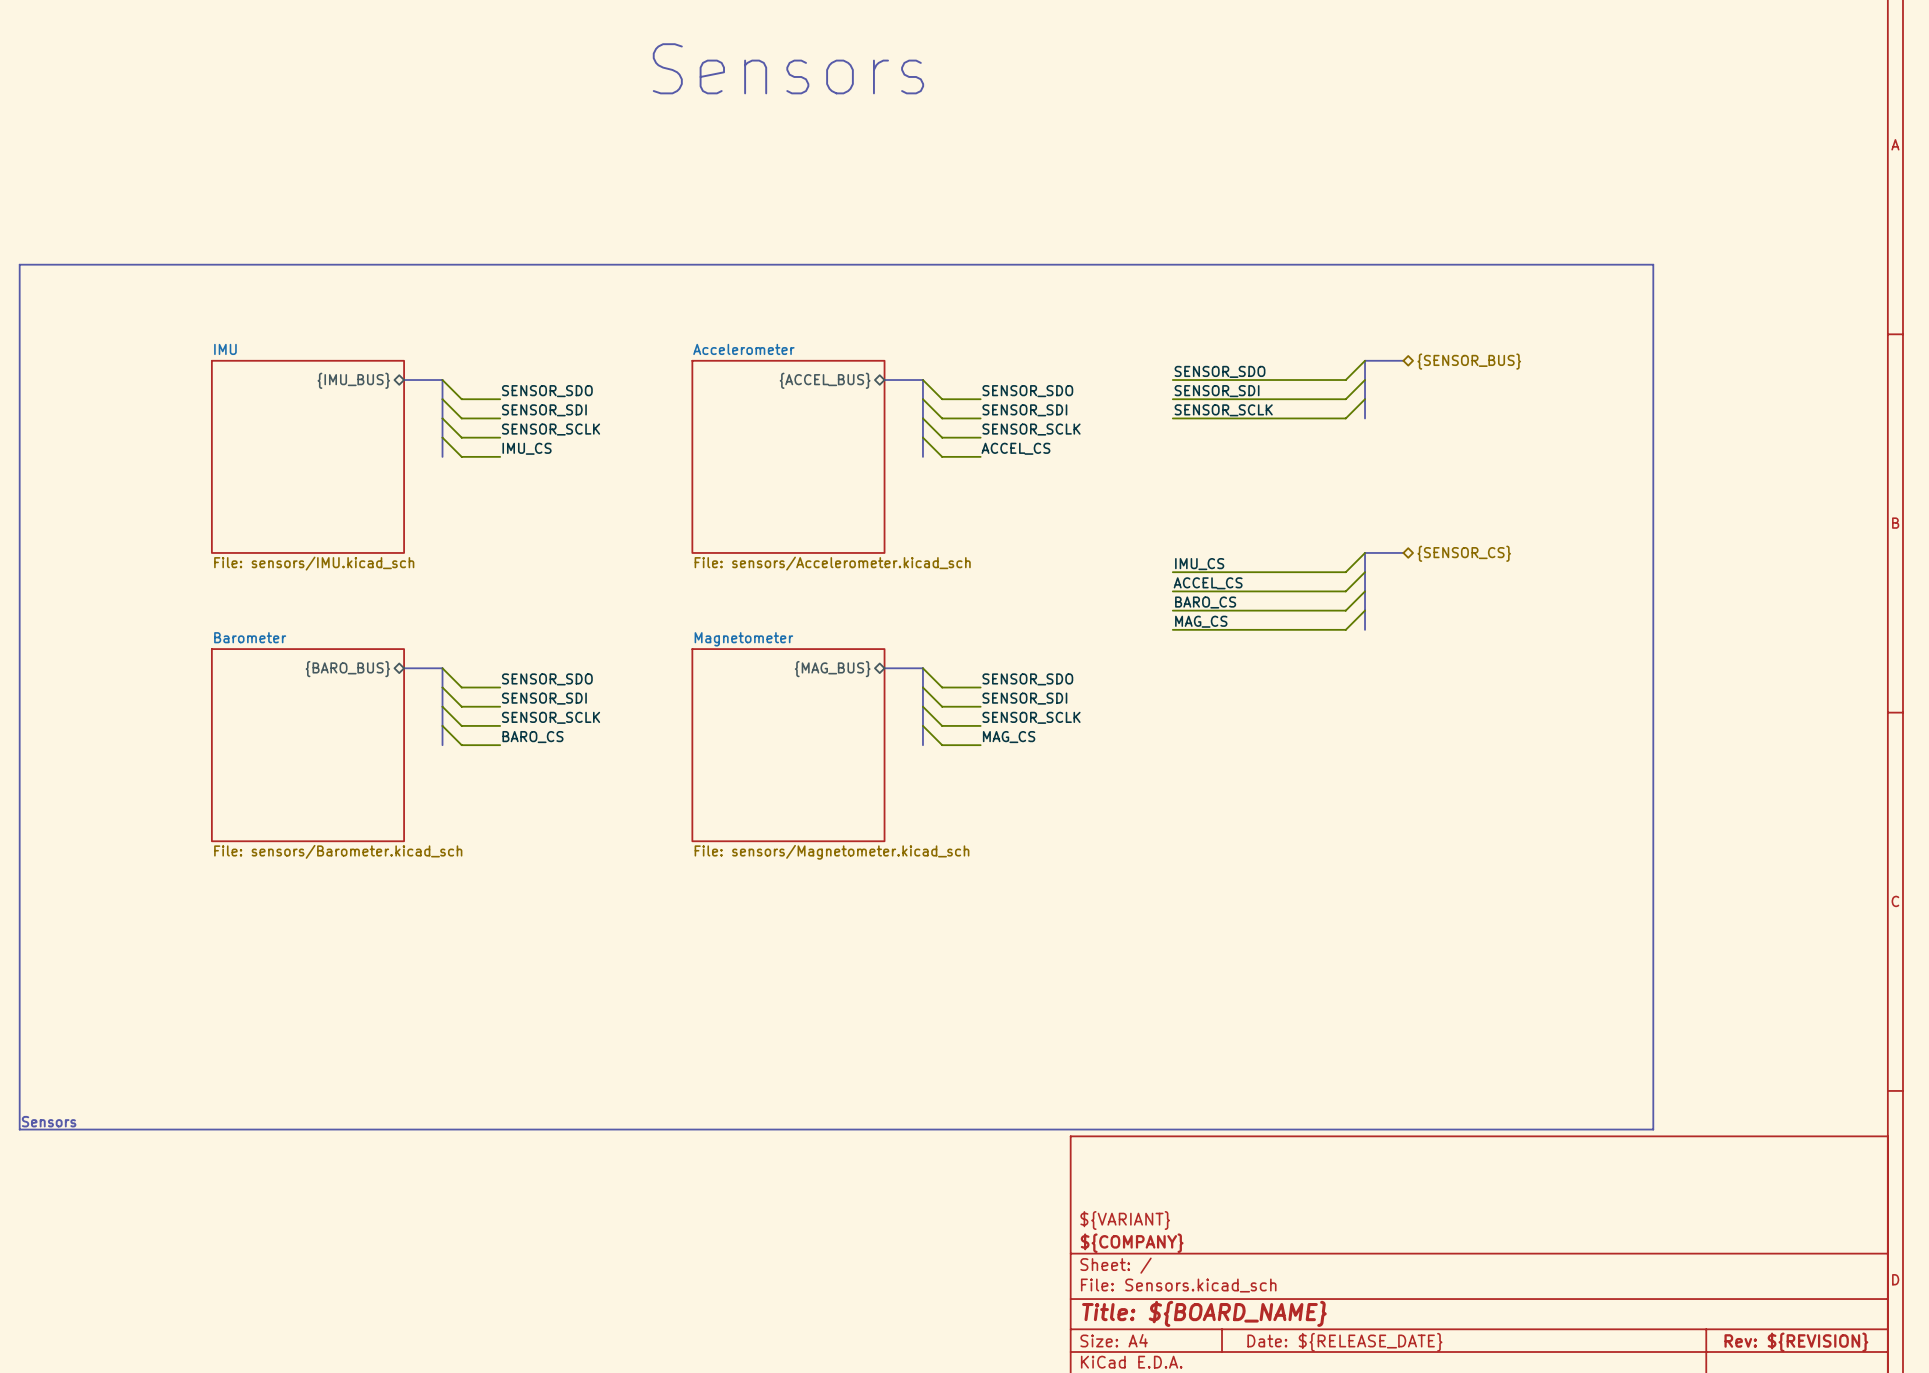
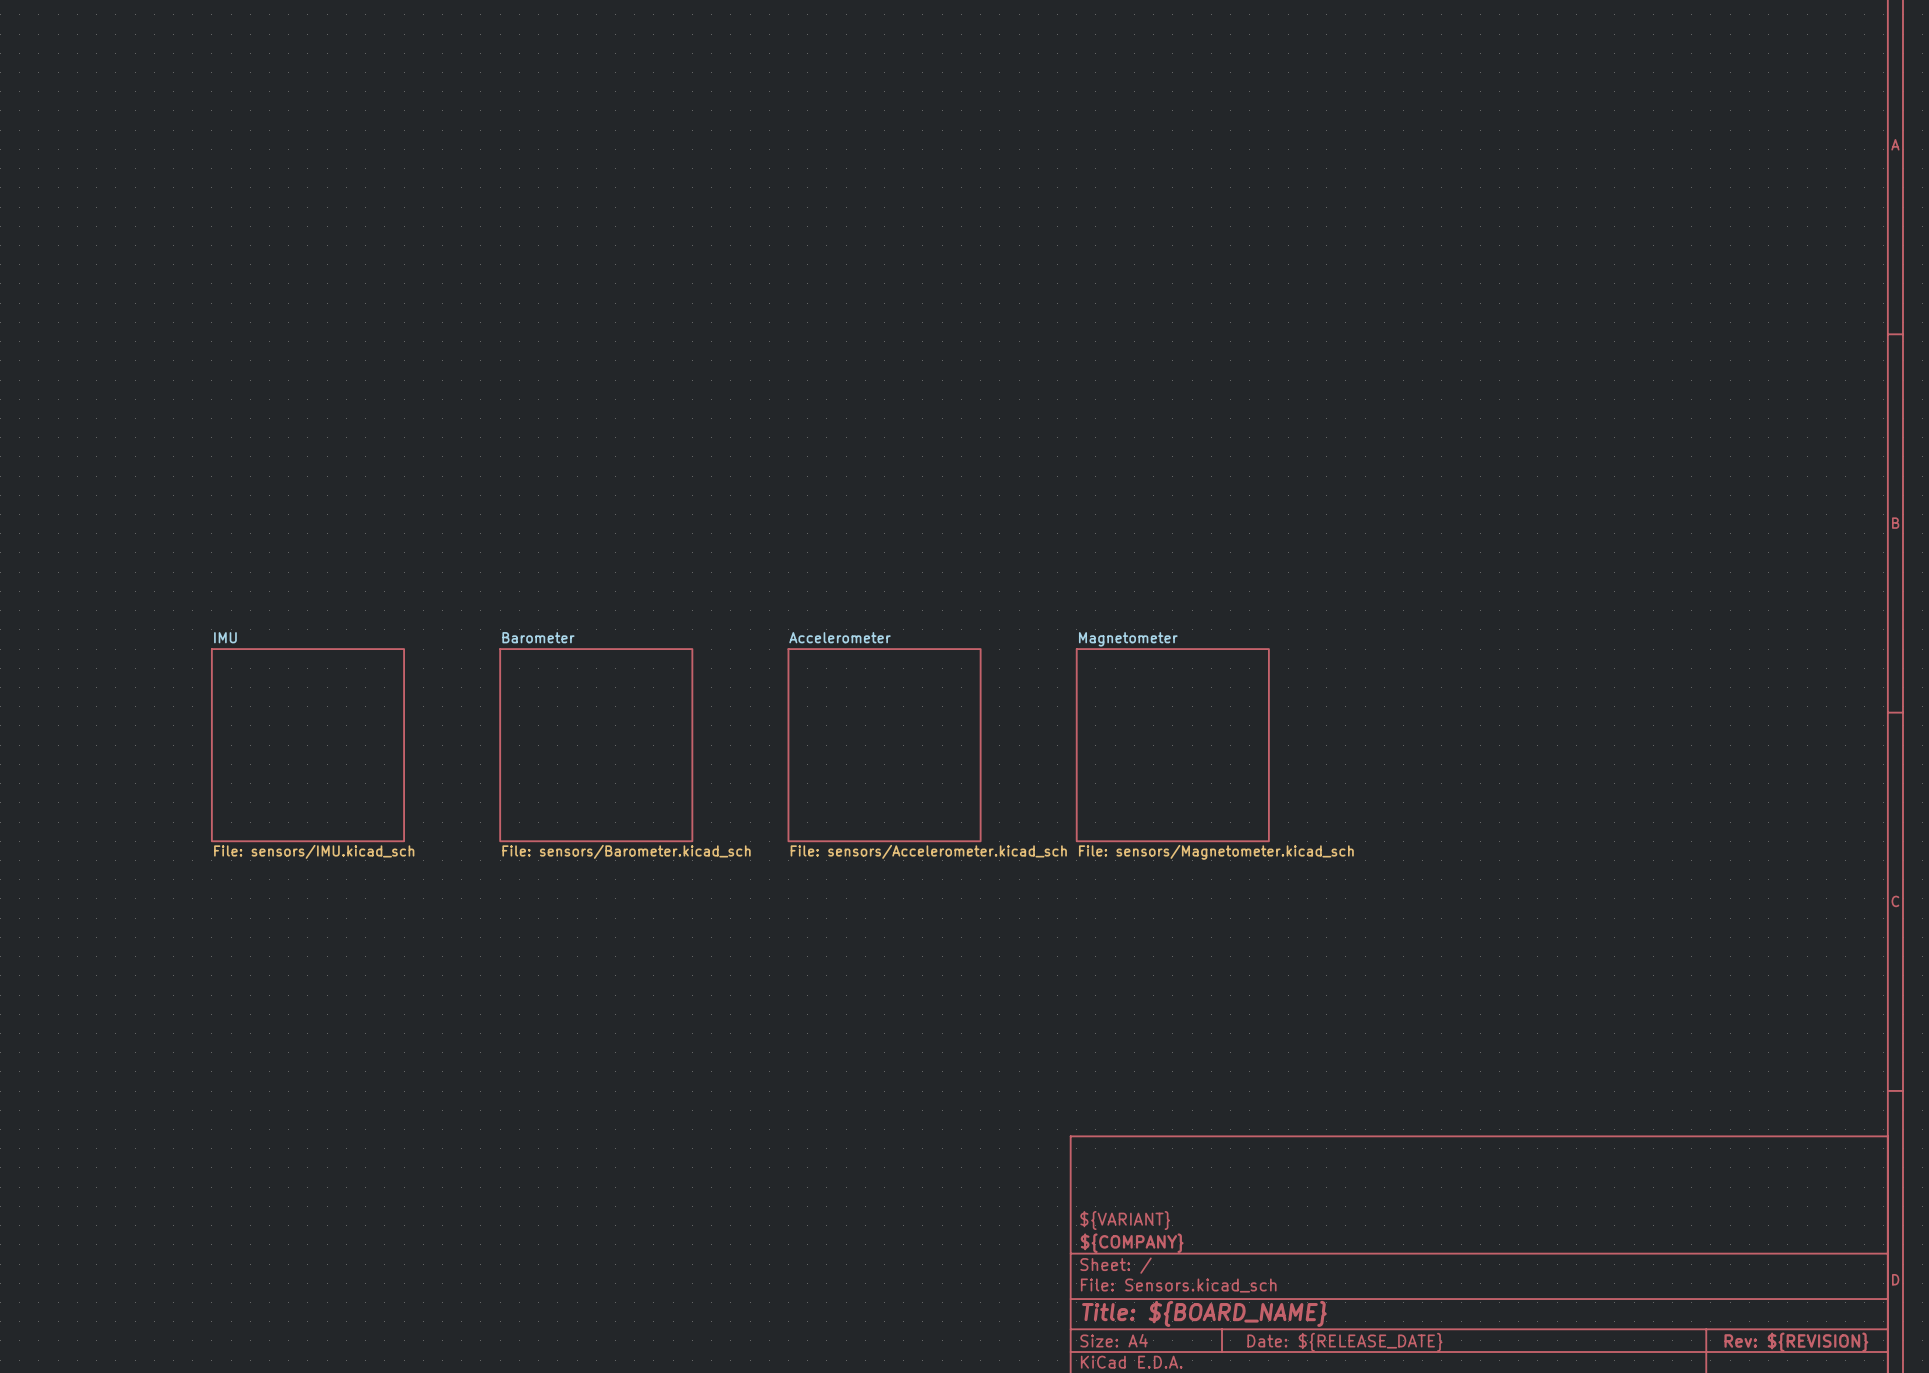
text: Sensors (788, 68) -> none
line: (19, 264) (1653, 264) (1653, 1129) (19, 1129) (19, 264) -> none
wire: (1365, 360) (1345, 380) (1172, 380) -> none
bus: (1403, 360) (1365, 360) (1365, 418) -> none
hierarchical label: {SENSOR_BUS} (1469, 361) -> none
label: SENSOR_SDO (1220, 371) -> none
sheet pin: {IMU_BUS} (353, 380) -> none
bus: (404, 380) (442, 380) (442, 456) -> none
wire: (442, 380) (461, 399) (500, 399) -> none
sheet pin: {ACCEL_BUS} (825, 380) -> none
bus: (884, 380) (922, 380) (922, 456) -> none
wire: (922, 380) (942, 399) (980, 399) -> none
wire: (1365, 380) (1345, 399) (1172, 399) -> none
label: SENSOR_SDO (547, 391) -> none
label: SENSOR_SDO (1027, 391) -> none
label: SENSOR_SDI (1217, 391) -> none
wire: (442, 399) (461, 418) (500, 418) -> none
wire: (922, 399) (942, 418) (980, 418) -> none
wire: (1365, 399) (1345, 418) (1172, 418) -> none
label: SENSOR_SDI (544, 410) -> none
label: SENSOR_SDI (1024, 410) -> none
label: SENSOR_SCLK (1223, 410) -> none
wire: (442, 418) (461, 437) (500, 437) -> none
wire: (922, 418) (942, 437) (980, 437) -> none
label: SENSOR_SCLK (551, 429) -> none
label: SENSOR_SCLK (1031, 429) -> none
wire: (442, 437) (461, 456) (500, 456) -> none
wire: (922, 437) (942, 456) (980, 456) -> none
label: IMU_CS (527, 448) -> none
label: ACCEL_CS (1015, 448) -> none
sheet IMU: File: sensors/IMU.kicad_sch (307, 456) -> none
sheet Accelerometer: File: sensors/Accelerometer.kicad_sch (788, 456) -> none
wire: (1365, 552) (1345, 572) (1172, 572) -> none
bus: (1403, 552) (1365, 552) (1365, 629) -> none
hierarchical label: {SENSOR_CS} (1464, 553) -> none
label: IMU_CS (1199, 564) -> none
wire: (1365, 572) (1345, 591) (1172, 591) -> none
label: ACCEL_CS (1208, 583) -> none
wire: (1365, 591) (1345, 610) (1172, 610) -> none
label: BARO_CS (1205, 602) -> none
wire: (1365, 610) (1345, 629) (1172, 629) -> none
label: MAG_CS (1201, 621) -> none
sheet Barometer name: Barometer (250, 637) -> IMU (225, 637)
bus: (404, 668) (442, 668) (442, 745) -> none
wire: (442, 668) (461, 687) (500, 687) -> none
bus: (884, 668) (922, 668) (922, 745) -> none
wire: (922, 668) (942, 687) (980, 687) -> none
sheet pin: {BARO_BUS} (347, 669) -> none
sheet pin: {MAG_BUS} (832, 669) -> none
label: SENSOR_SDO (547, 679) -> none
label: SENSOR_SDO (1027, 679) -> none
wire: (442, 687) (461, 706) (500, 706) -> none
wire: (922, 687) (942, 706) (980, 706) -> none
label: SENSOR_SDI (544, 698) -> none
label: SENSOR_SDI (1024, 698) -> none
wire: (442, 706) (461, 725) (500, 725) -> none
wire: (922, 706) (942, 725) (980, 725) -> none
label: SENSOR_SCLK (551, 717) -> none
label: SENSOR_SCLK (1031, 717) -> none
wire: (442, 725) (461, 745) (500, 745) -> none
wire: (922, 725) (942, 745) (980, 745) -> none
label: BARO_CS (532, 737) -> none
label: MAG_CS (1009, 737) -> none
sheet Barometer: none -> File: sensors/Barometer.kicad_sch (596, 745)
sheet Magnetometer: File: sensors/Magnetometer.kicad_sch (788, 745) -> none
sheet Accelerometer: none -> File: sensors/Accelerometer.kicad_sch (884, 745)
sheet Magnetometer: none -> File: sensors/Magnetometer.kicad_sch (1172, 745)
sheet Barometer value: File: sensors/Barometer.kicad_sch (338, 851) -> File: sensors/IMU.kicad_sch (314, 851)
text: Sensors (49, 1121) -> none

